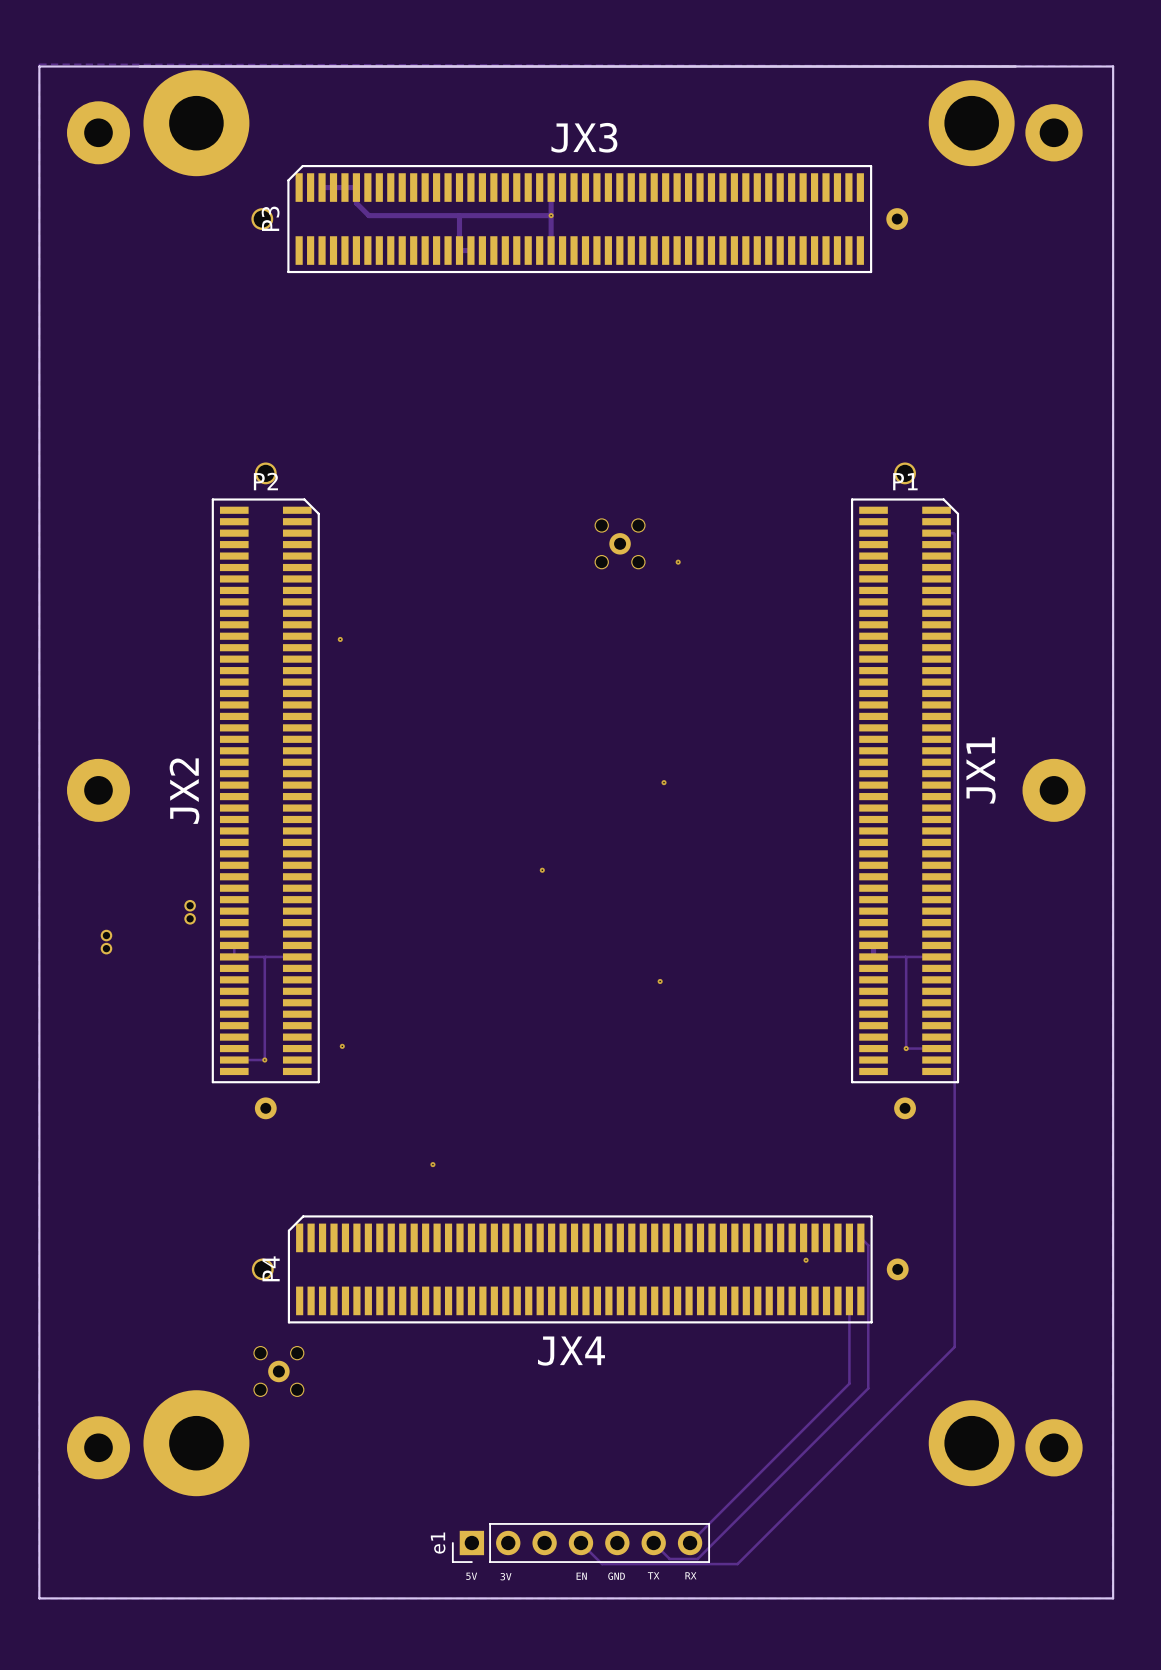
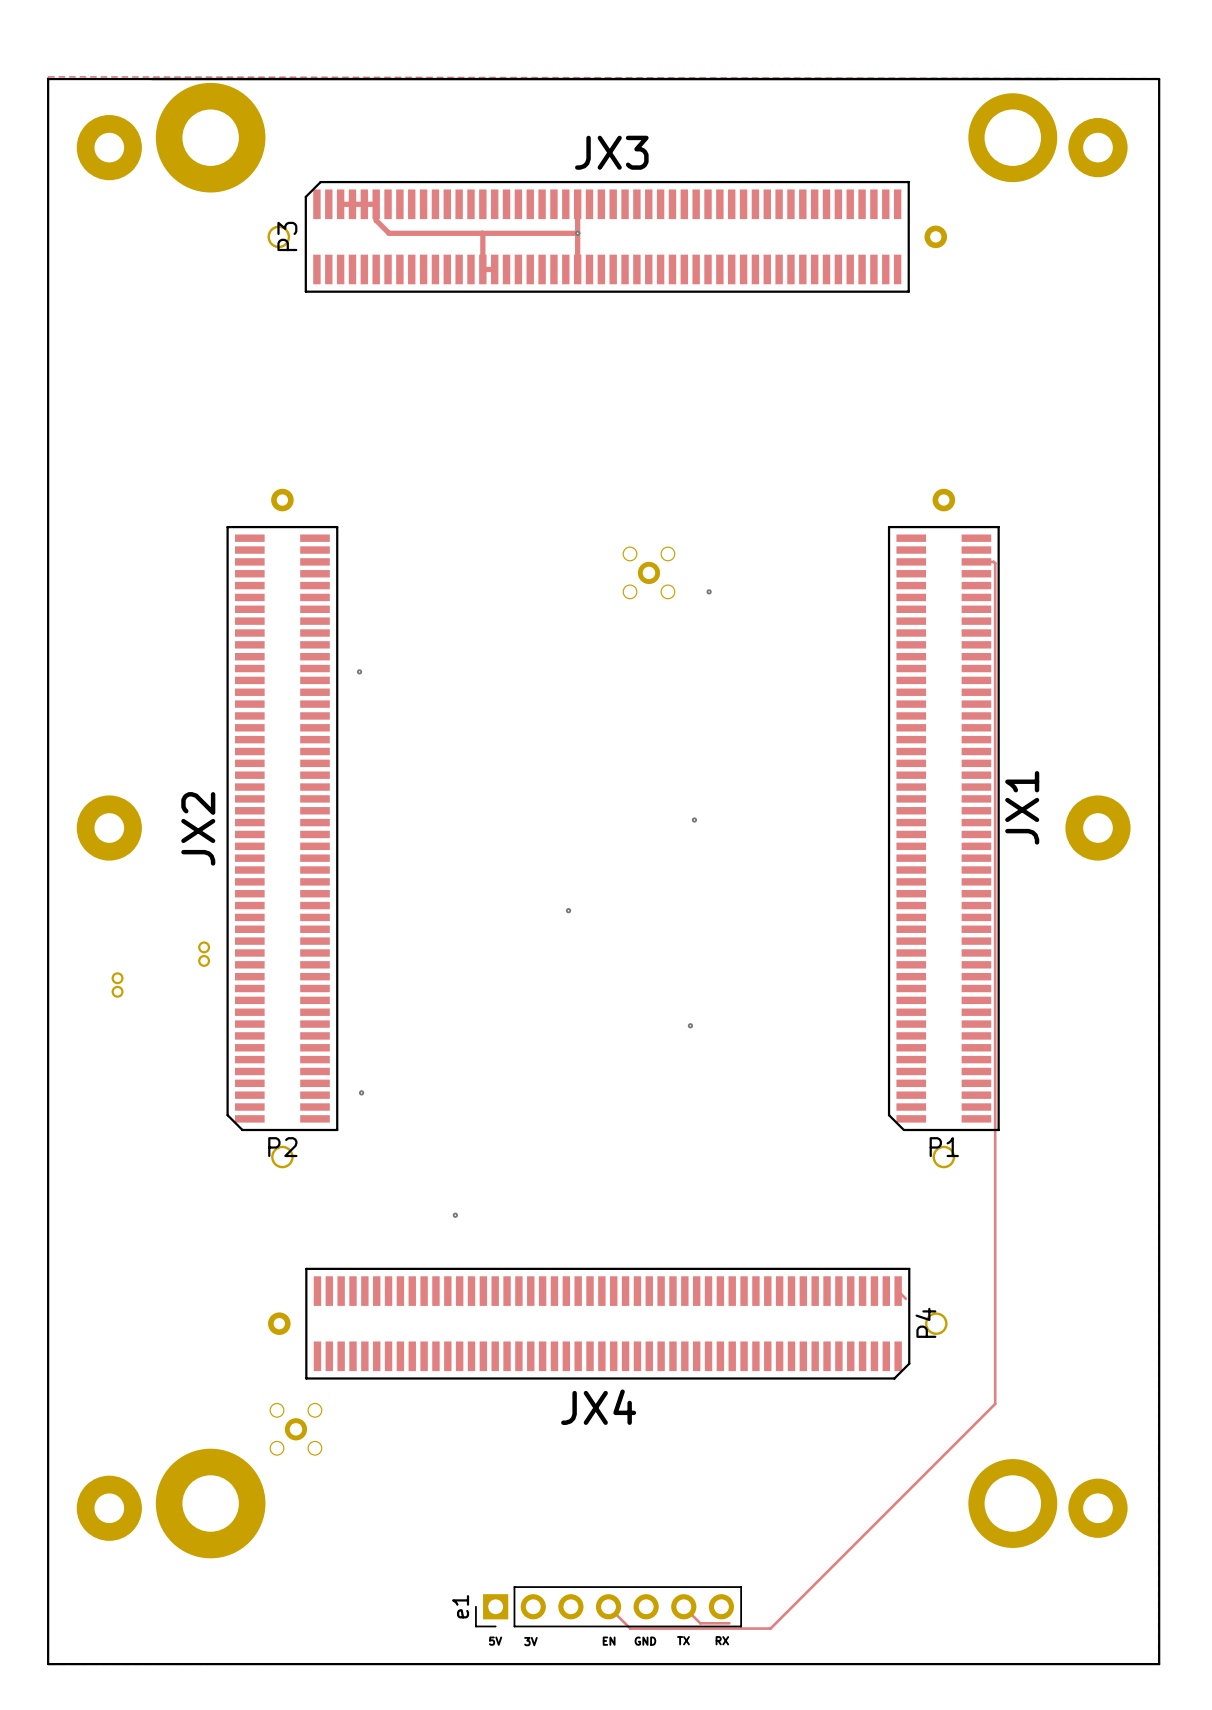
P2 rotation: 0° (265, 790) -> 180° (282, 828)
P1 rotation: 0° (905, 790) -> 180° (943, 828)
track: (234, 945) (234, 956) (297, 956) -> none
track: (873, 945) (873, 956) (936, 956) -> none
track: (265, 956) (264, 1060) (234, 1060) -> none
track: (905, 956) (906, 1048) (936, 1048) -> none
via: (906, 1048) -> none
via: (264, 1060) -> none
track: (868, 1245) (868, 1388) (697, 1558) -> none
via: (806, 1260) -> none
P4 rotation: 0° (580, 1269) -> 180° (607, 1323)
track: (849, 1300) (849, 1383) (690, 1542) -> none

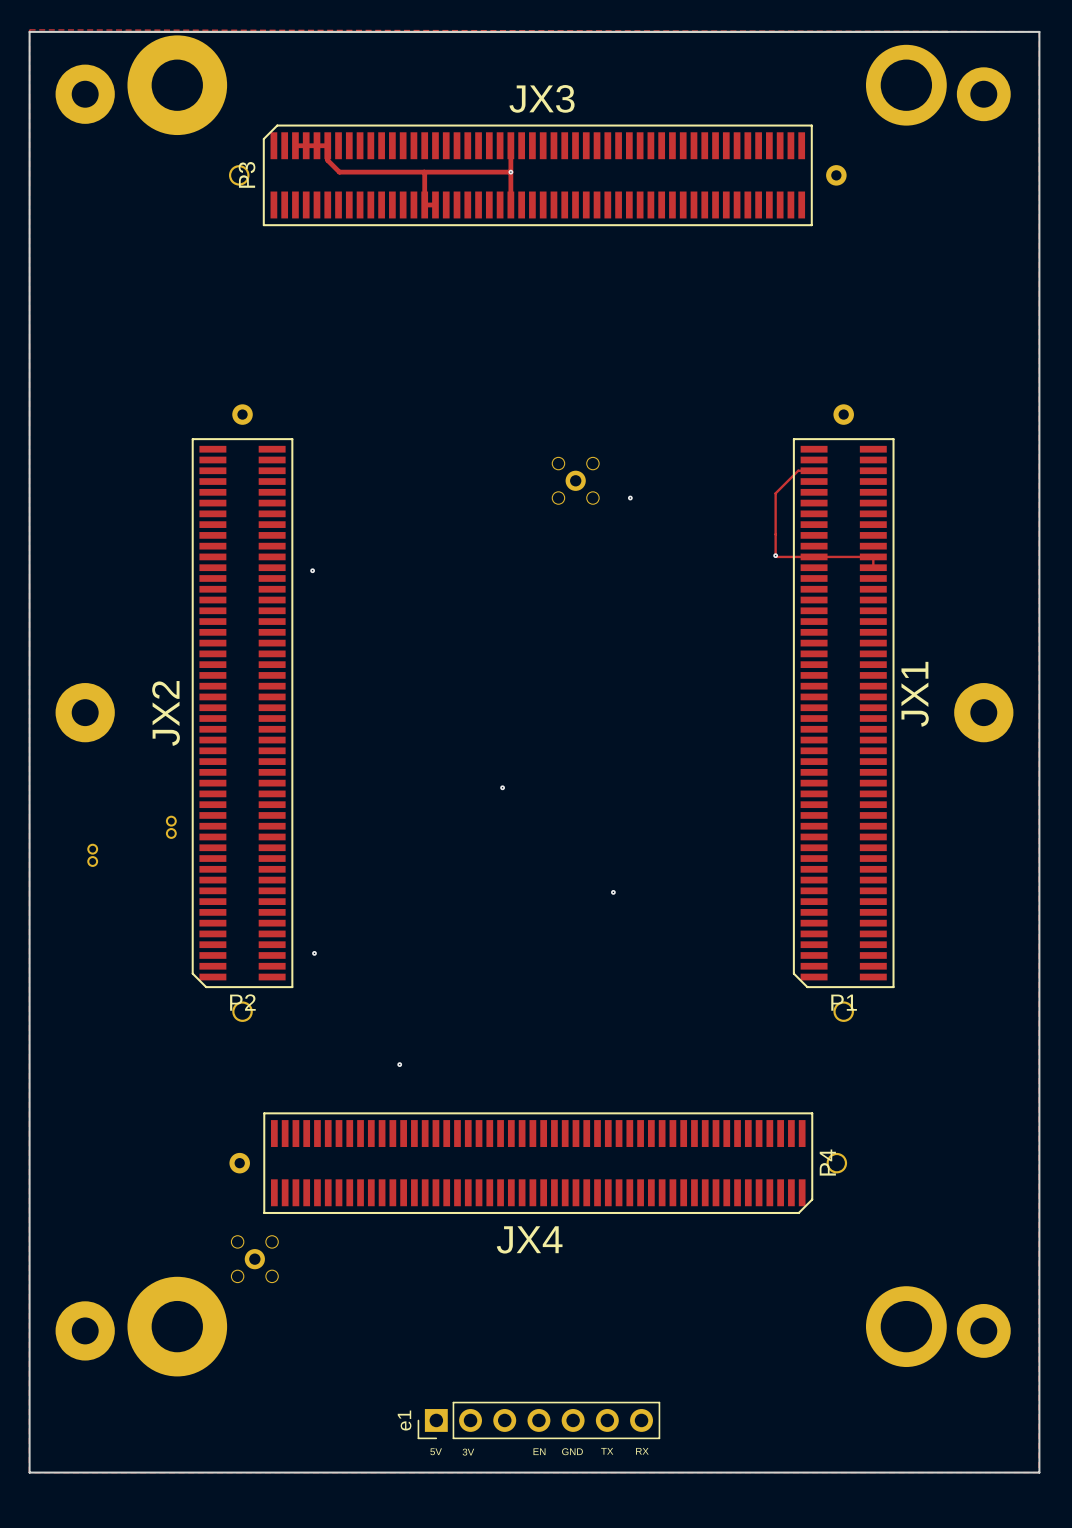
track: none -> (814, 470) (798, 470) (775, 493) (775, 555) (873, 556) (873, 567)
track: (976, 561) (995, 563) (995, 1403) (770, 1628) (630, 1628) (608, 1606) -> none
via: none -> (775, 555)
via: (694, 820) -> none
track: (898, 1291) (905, 1298) -> none
track: (683, 1606) (700, 1623) (729, 1623) -> none

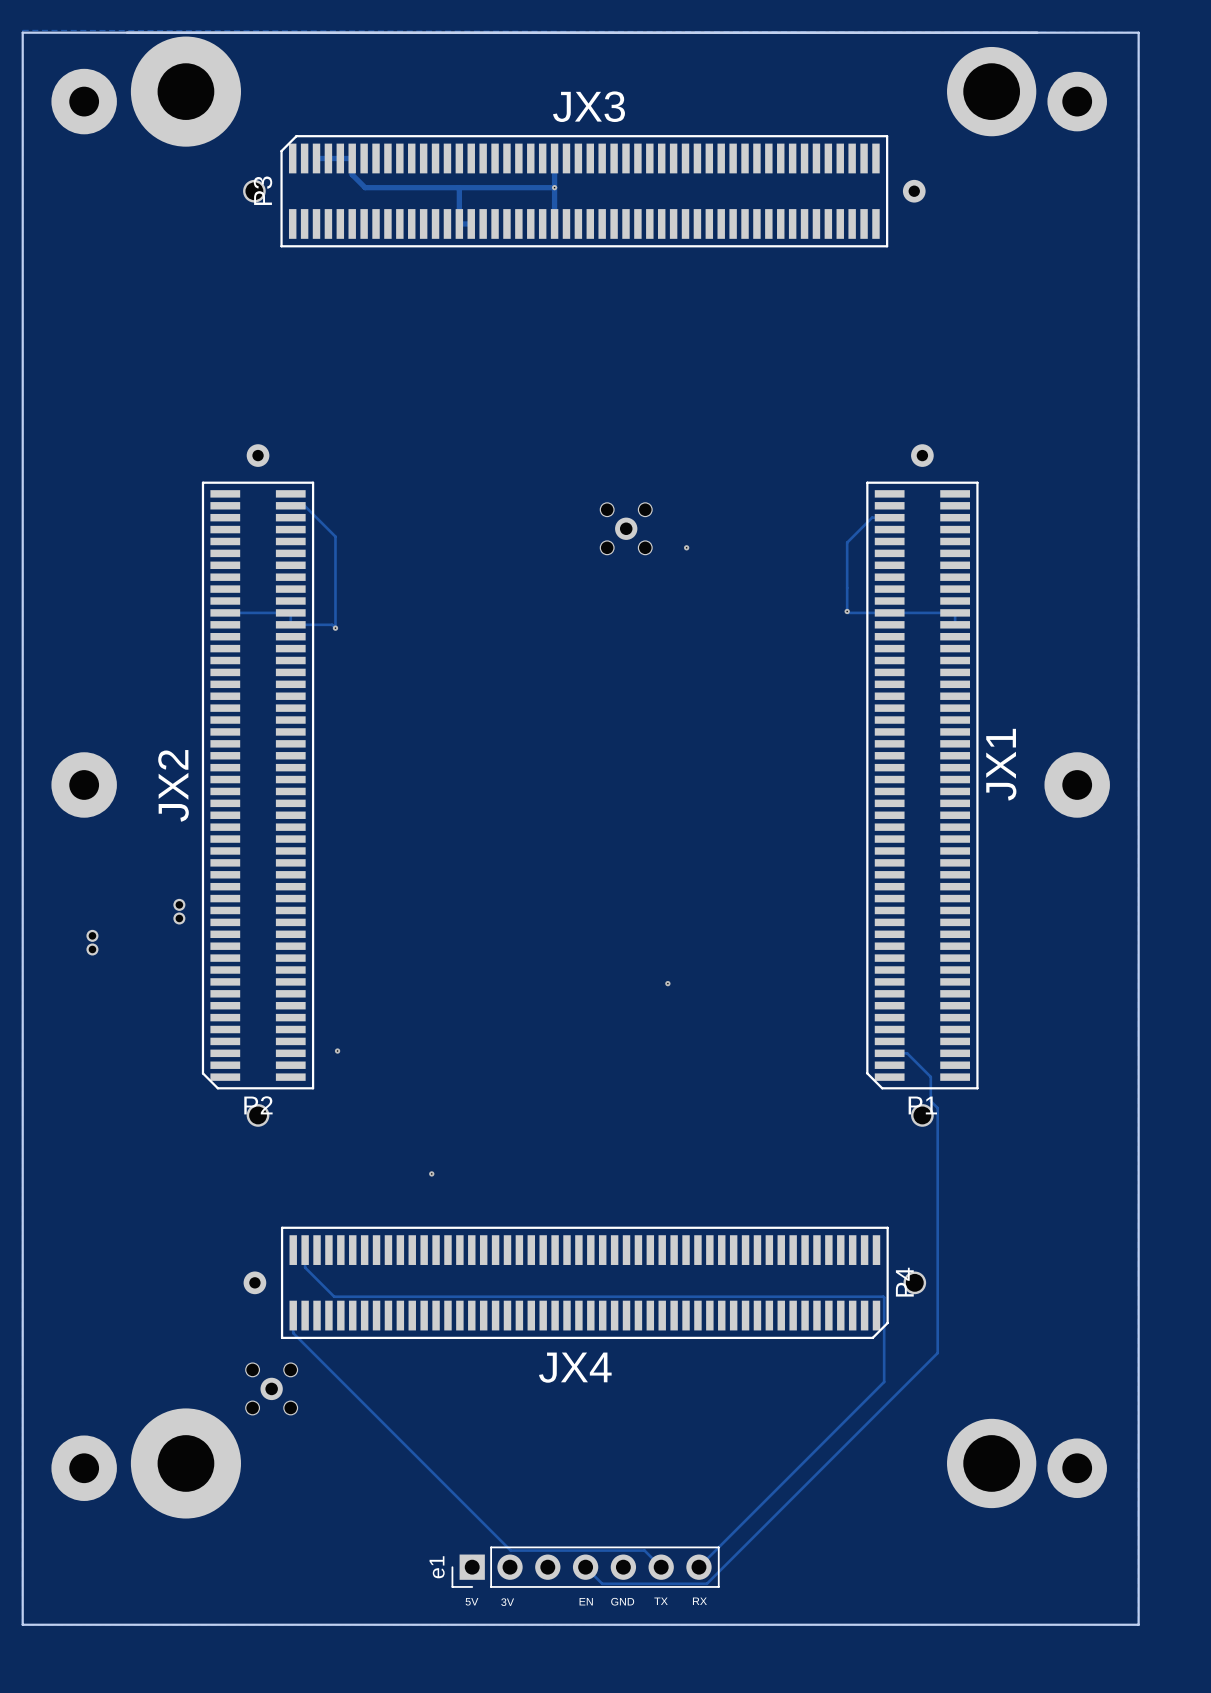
track: none -> (290, 505) (304, 505) (335, 536) (335, 628) (332, 624) (290, 624) (290, 612) (225, 612)
via: (502, 787) -> none
track: none -> (889, 1053) (907, 1053) (930, 1076) (930, 1101) (937, 1108) (937, 1353) (706, 1583) (602, 1583) (585, 1567)
track: none -> (305, 1250) (305, 1267) (334, 1296) (883, 1296) (884, 1381) (698, 1567)
track: none -> (293, 1315) (293, 1333) (510, 1550) (644, 1550) (661, 1567)

